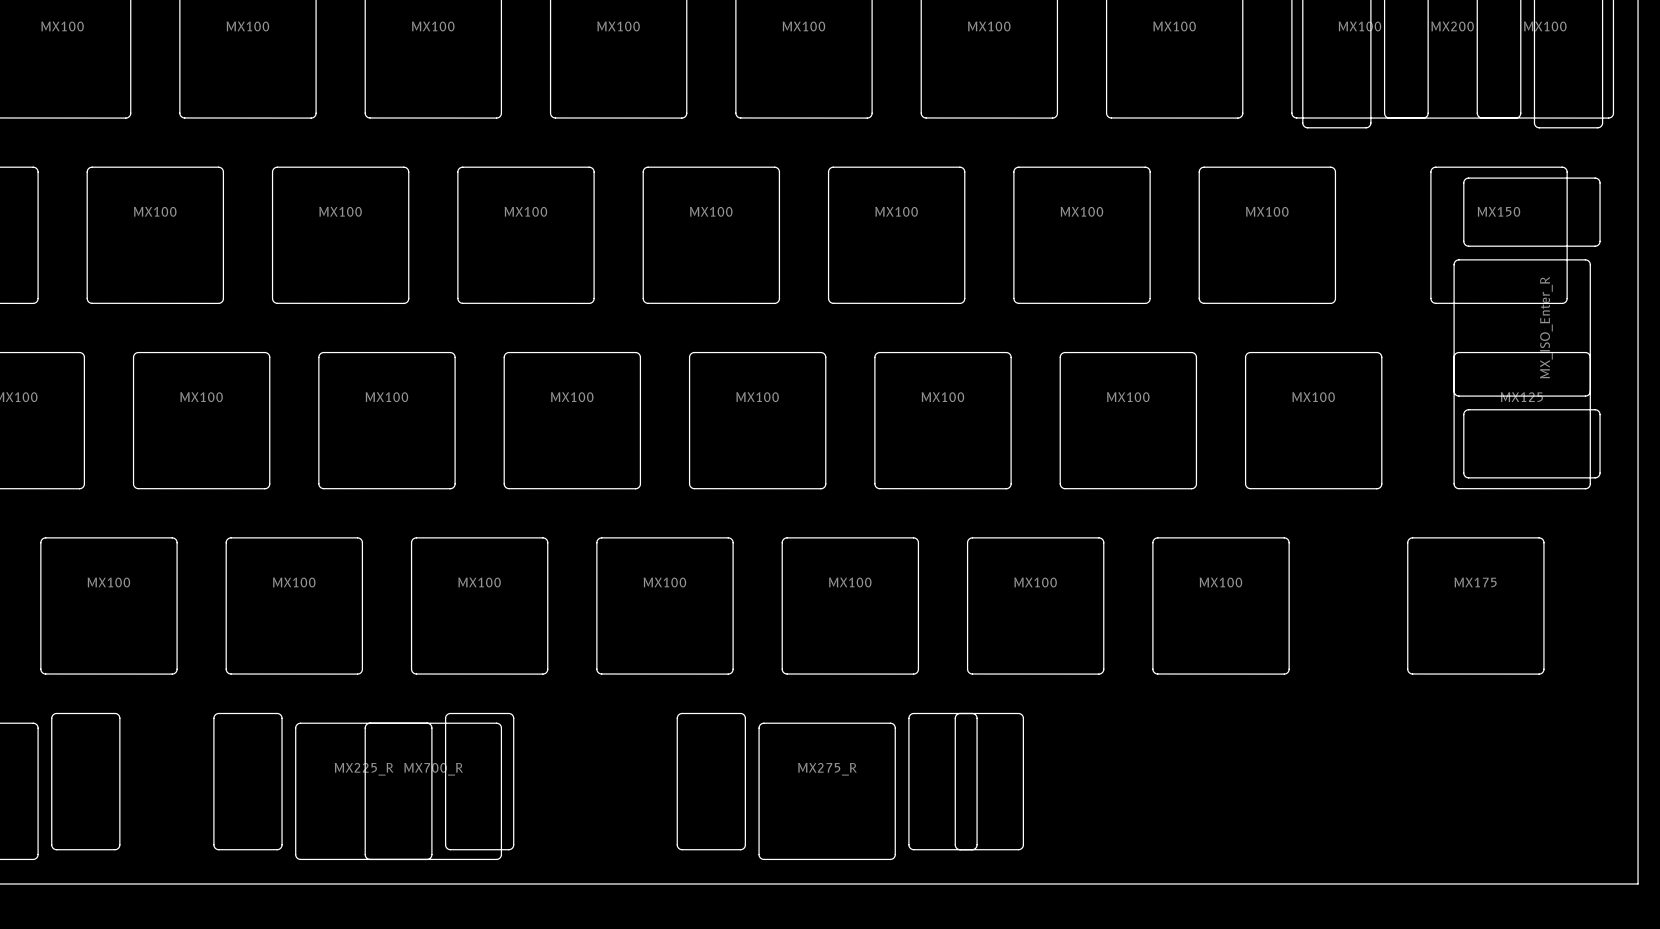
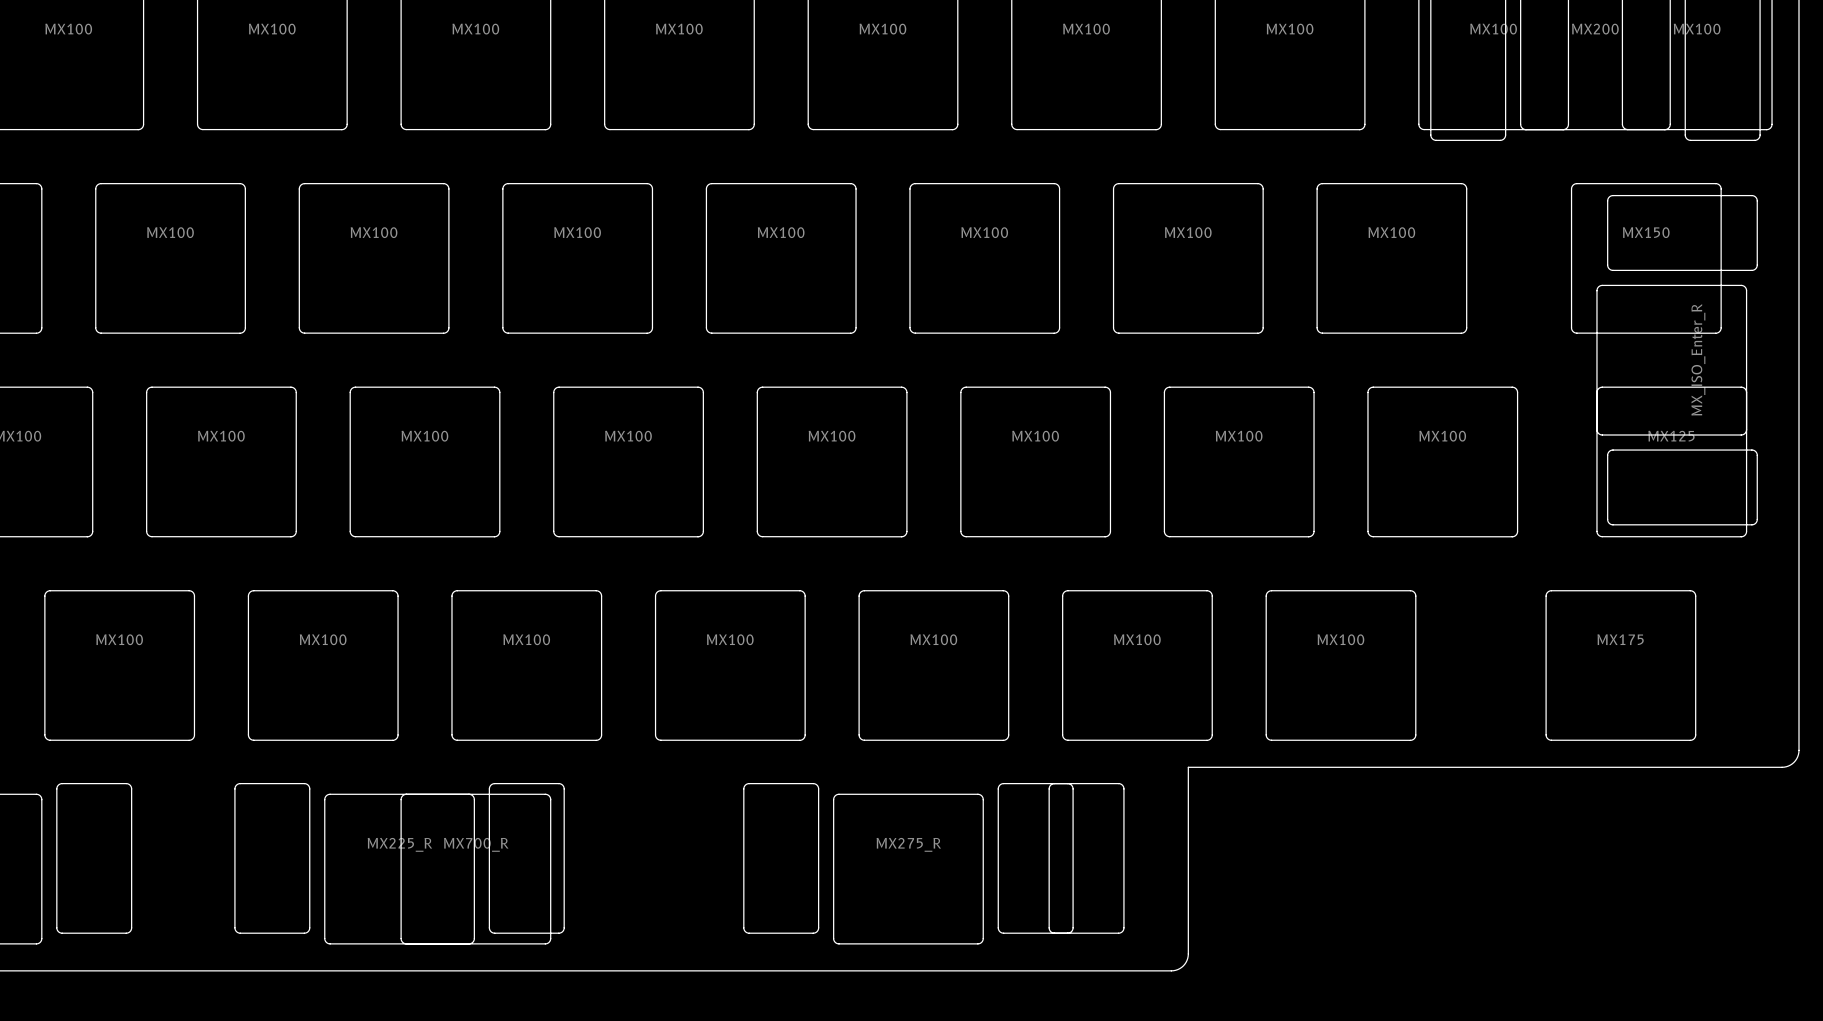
board edge: (1638, 683) (1638, 884) (1066, 884) -> (1798, 750) (1794, 762) (1782, 767) (1188, 767) (1188, 956) (1183, 965) (1171, 970)

